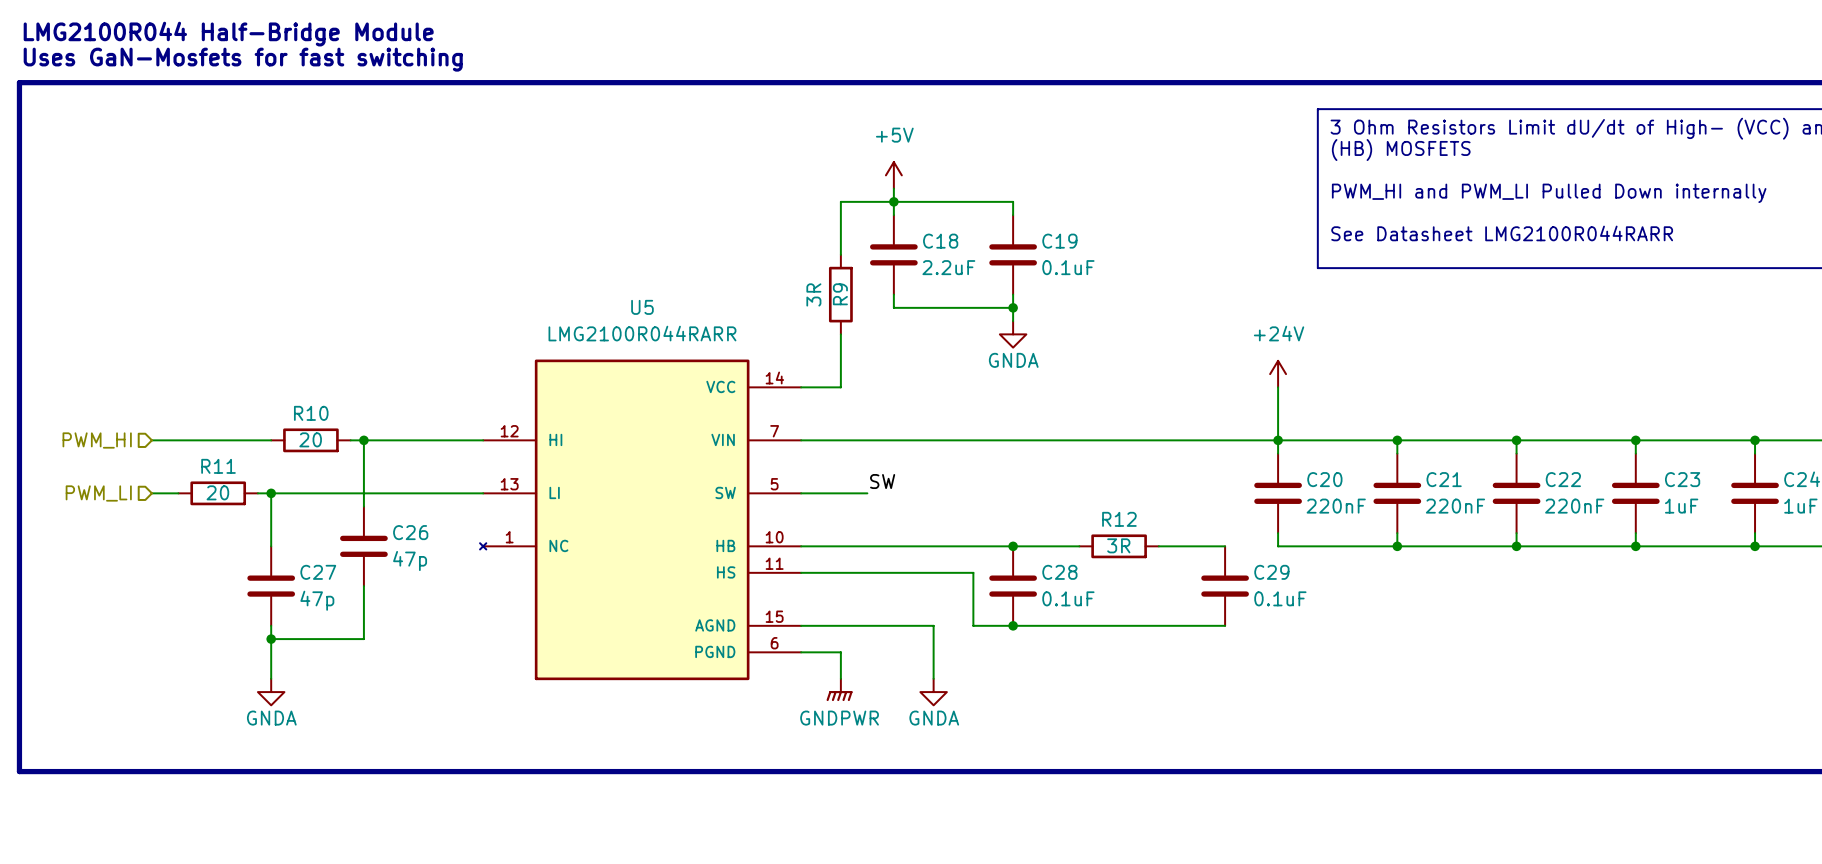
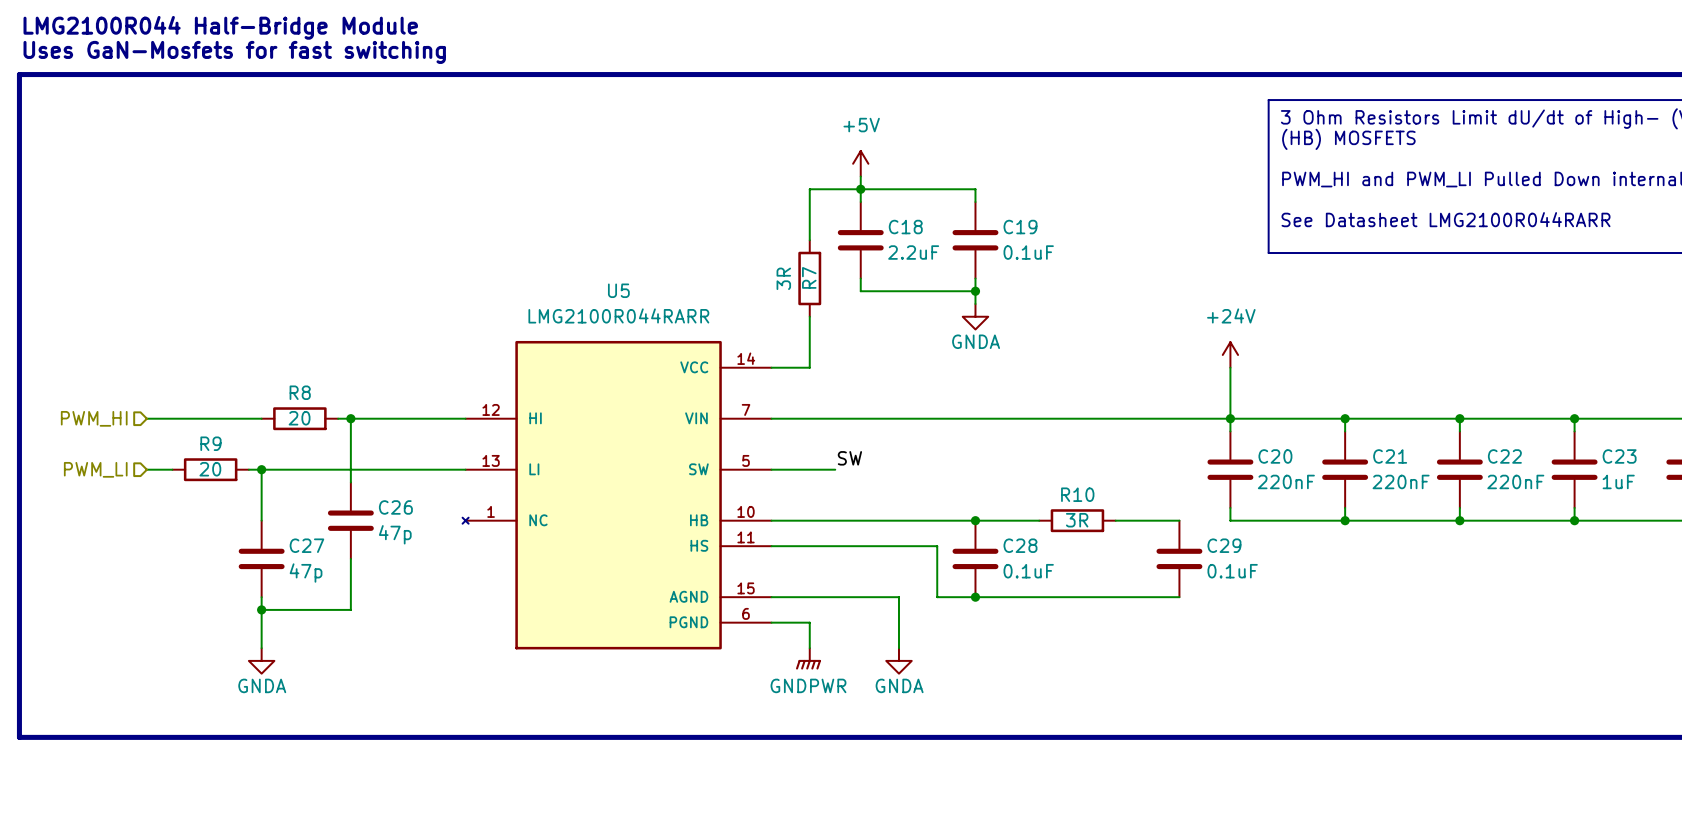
R9 name: R9 (840, 294) -> R7 (809, 277)
R10 name: R10 (311, 413) -> R8 (300, 392)
R11 name: R11 (218, 466) -> R9 (210, 443)
R12 name: R12 (1119, 519) -> R10 (1077, 494)

